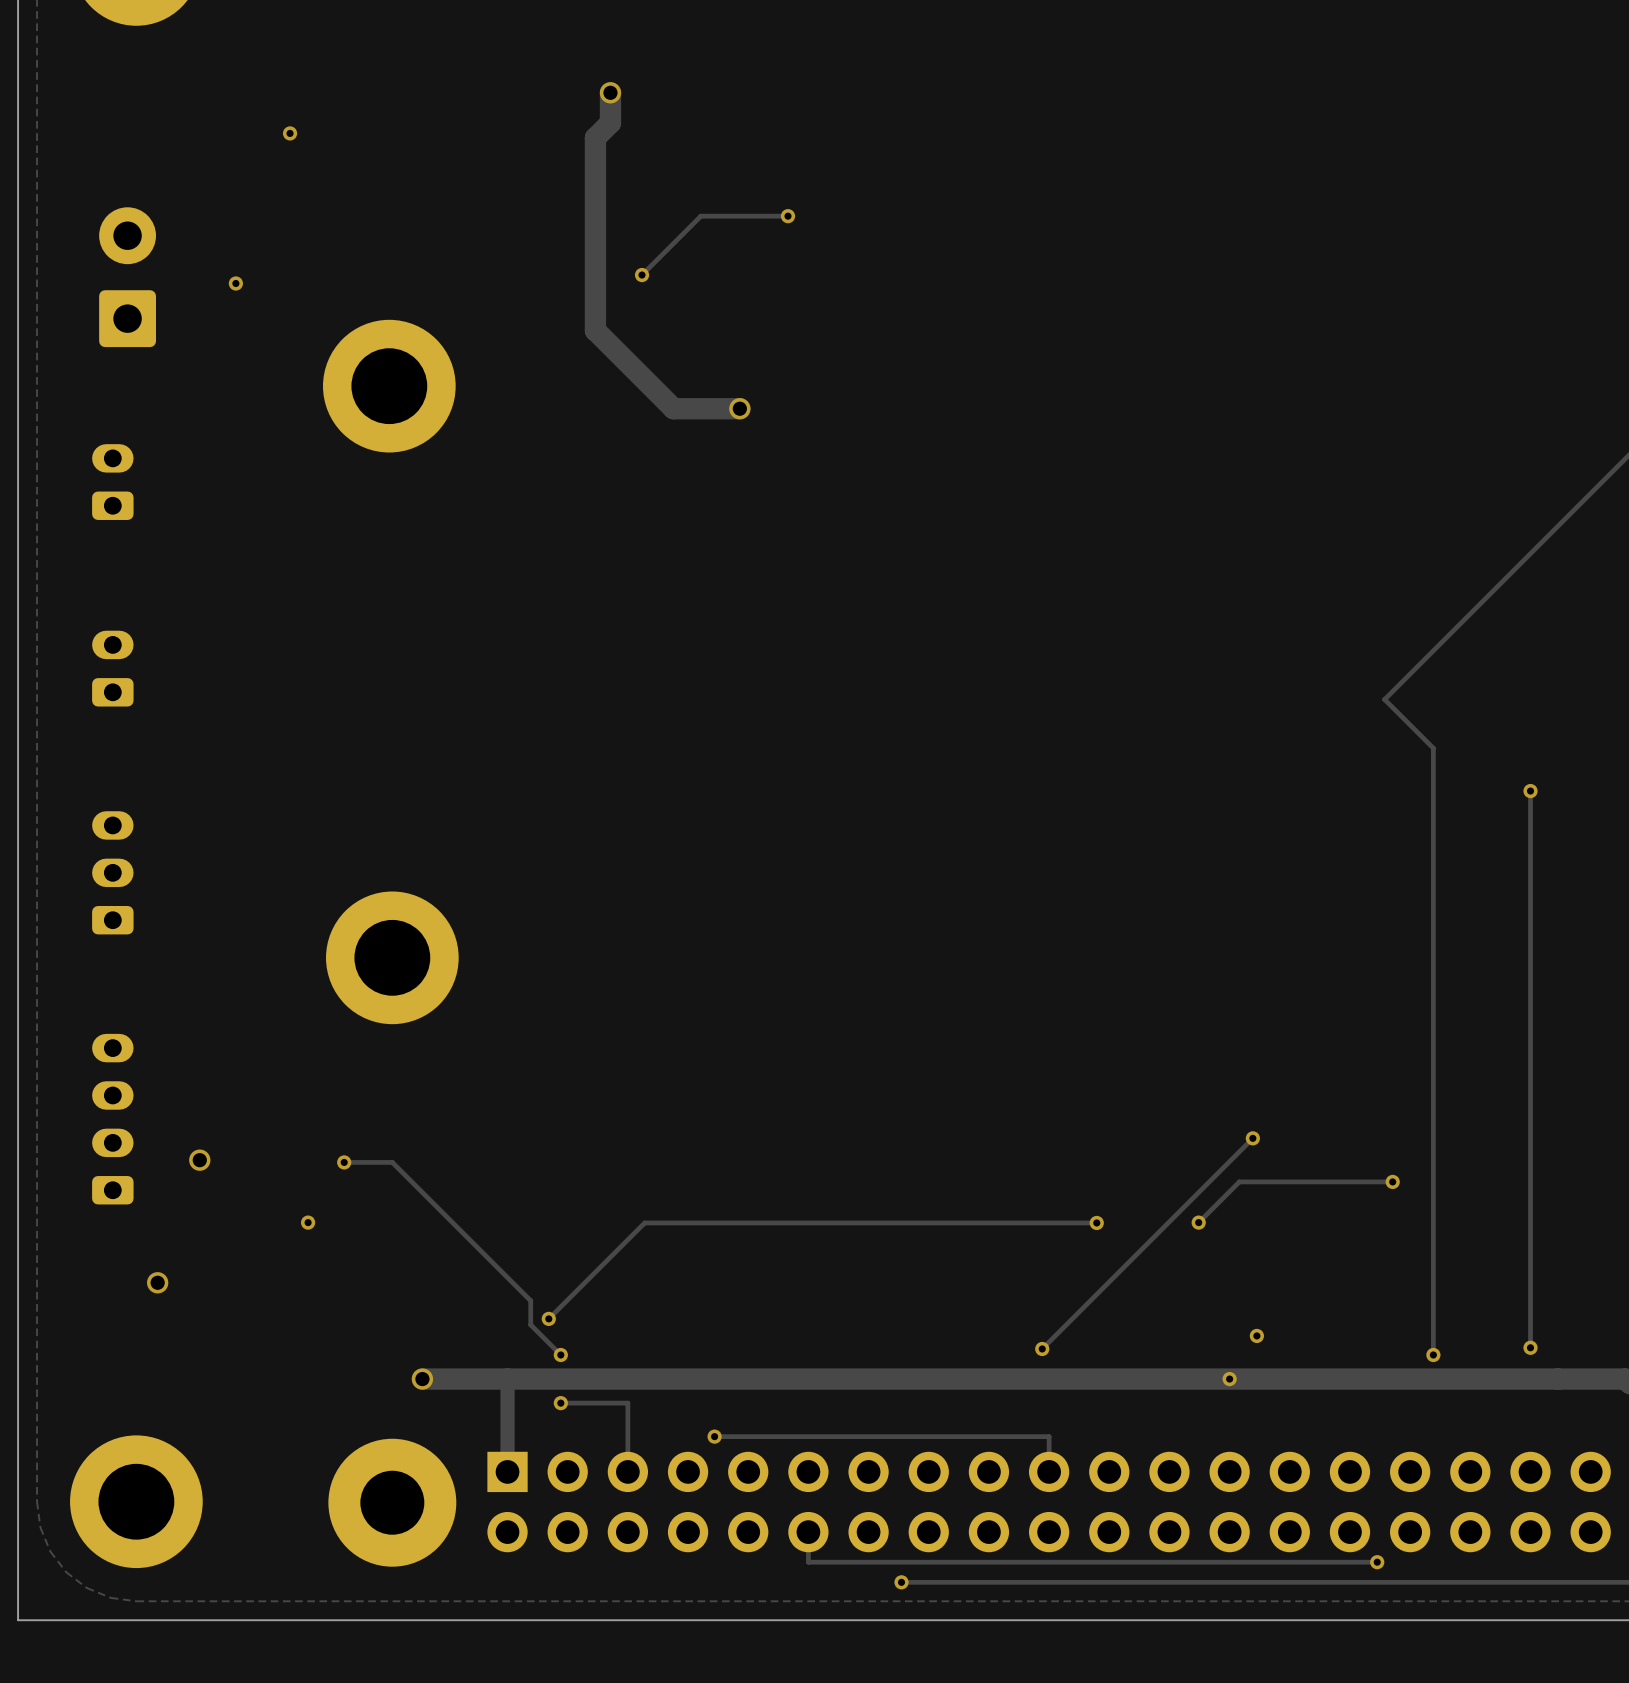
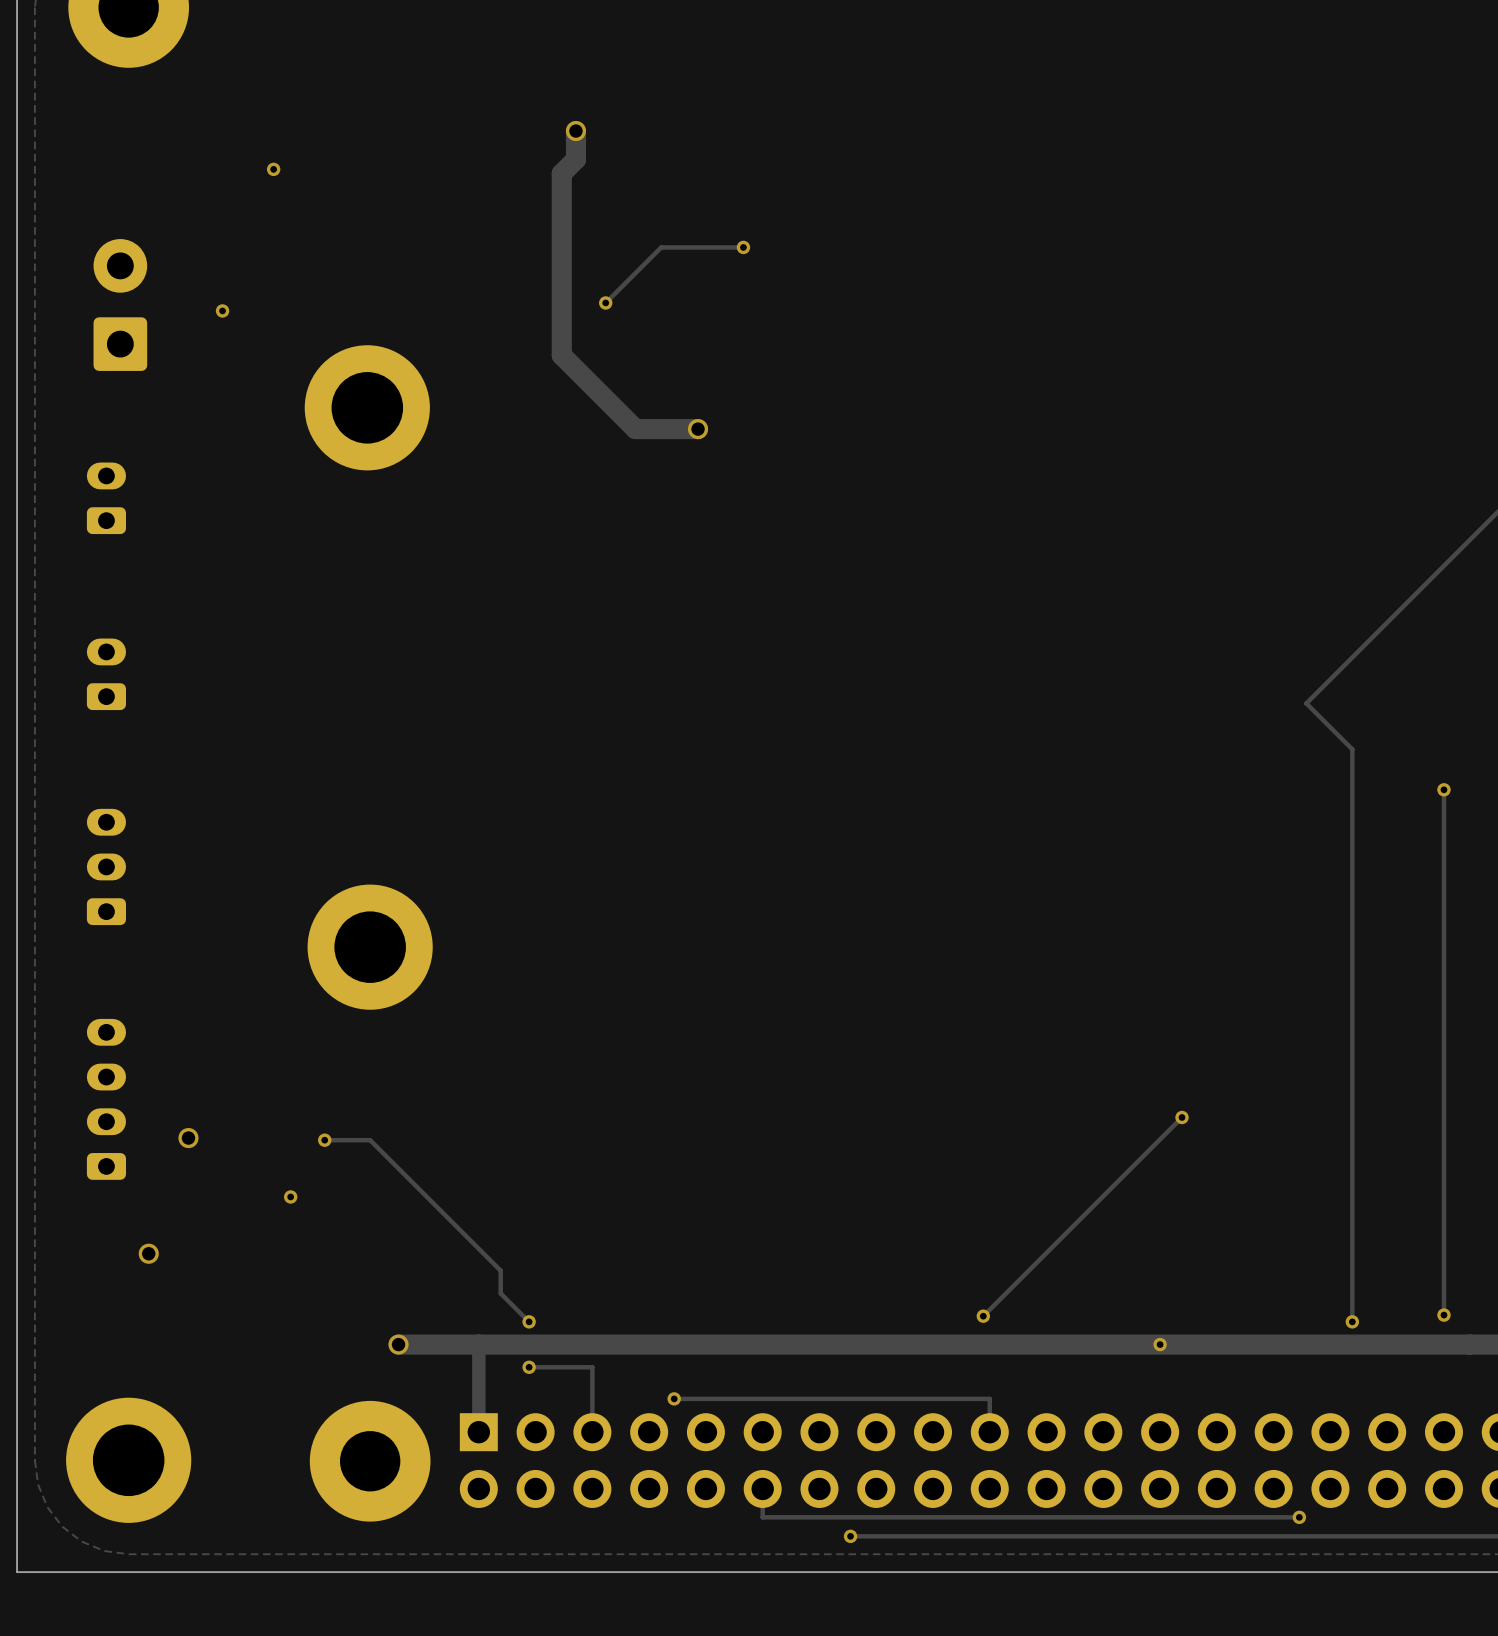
track: (1392, 1181) (1239, 1181) (1198, 1222) -> none
via: (1392, 1181) -> none
track: (1096, 1222) (644, 1222) (548, 1318) -> none
via: (1096, 1222) -> none
via: (1198, 1222) -> none
via: (548, 1318) -> none
via: (1256, 1335) -> none

